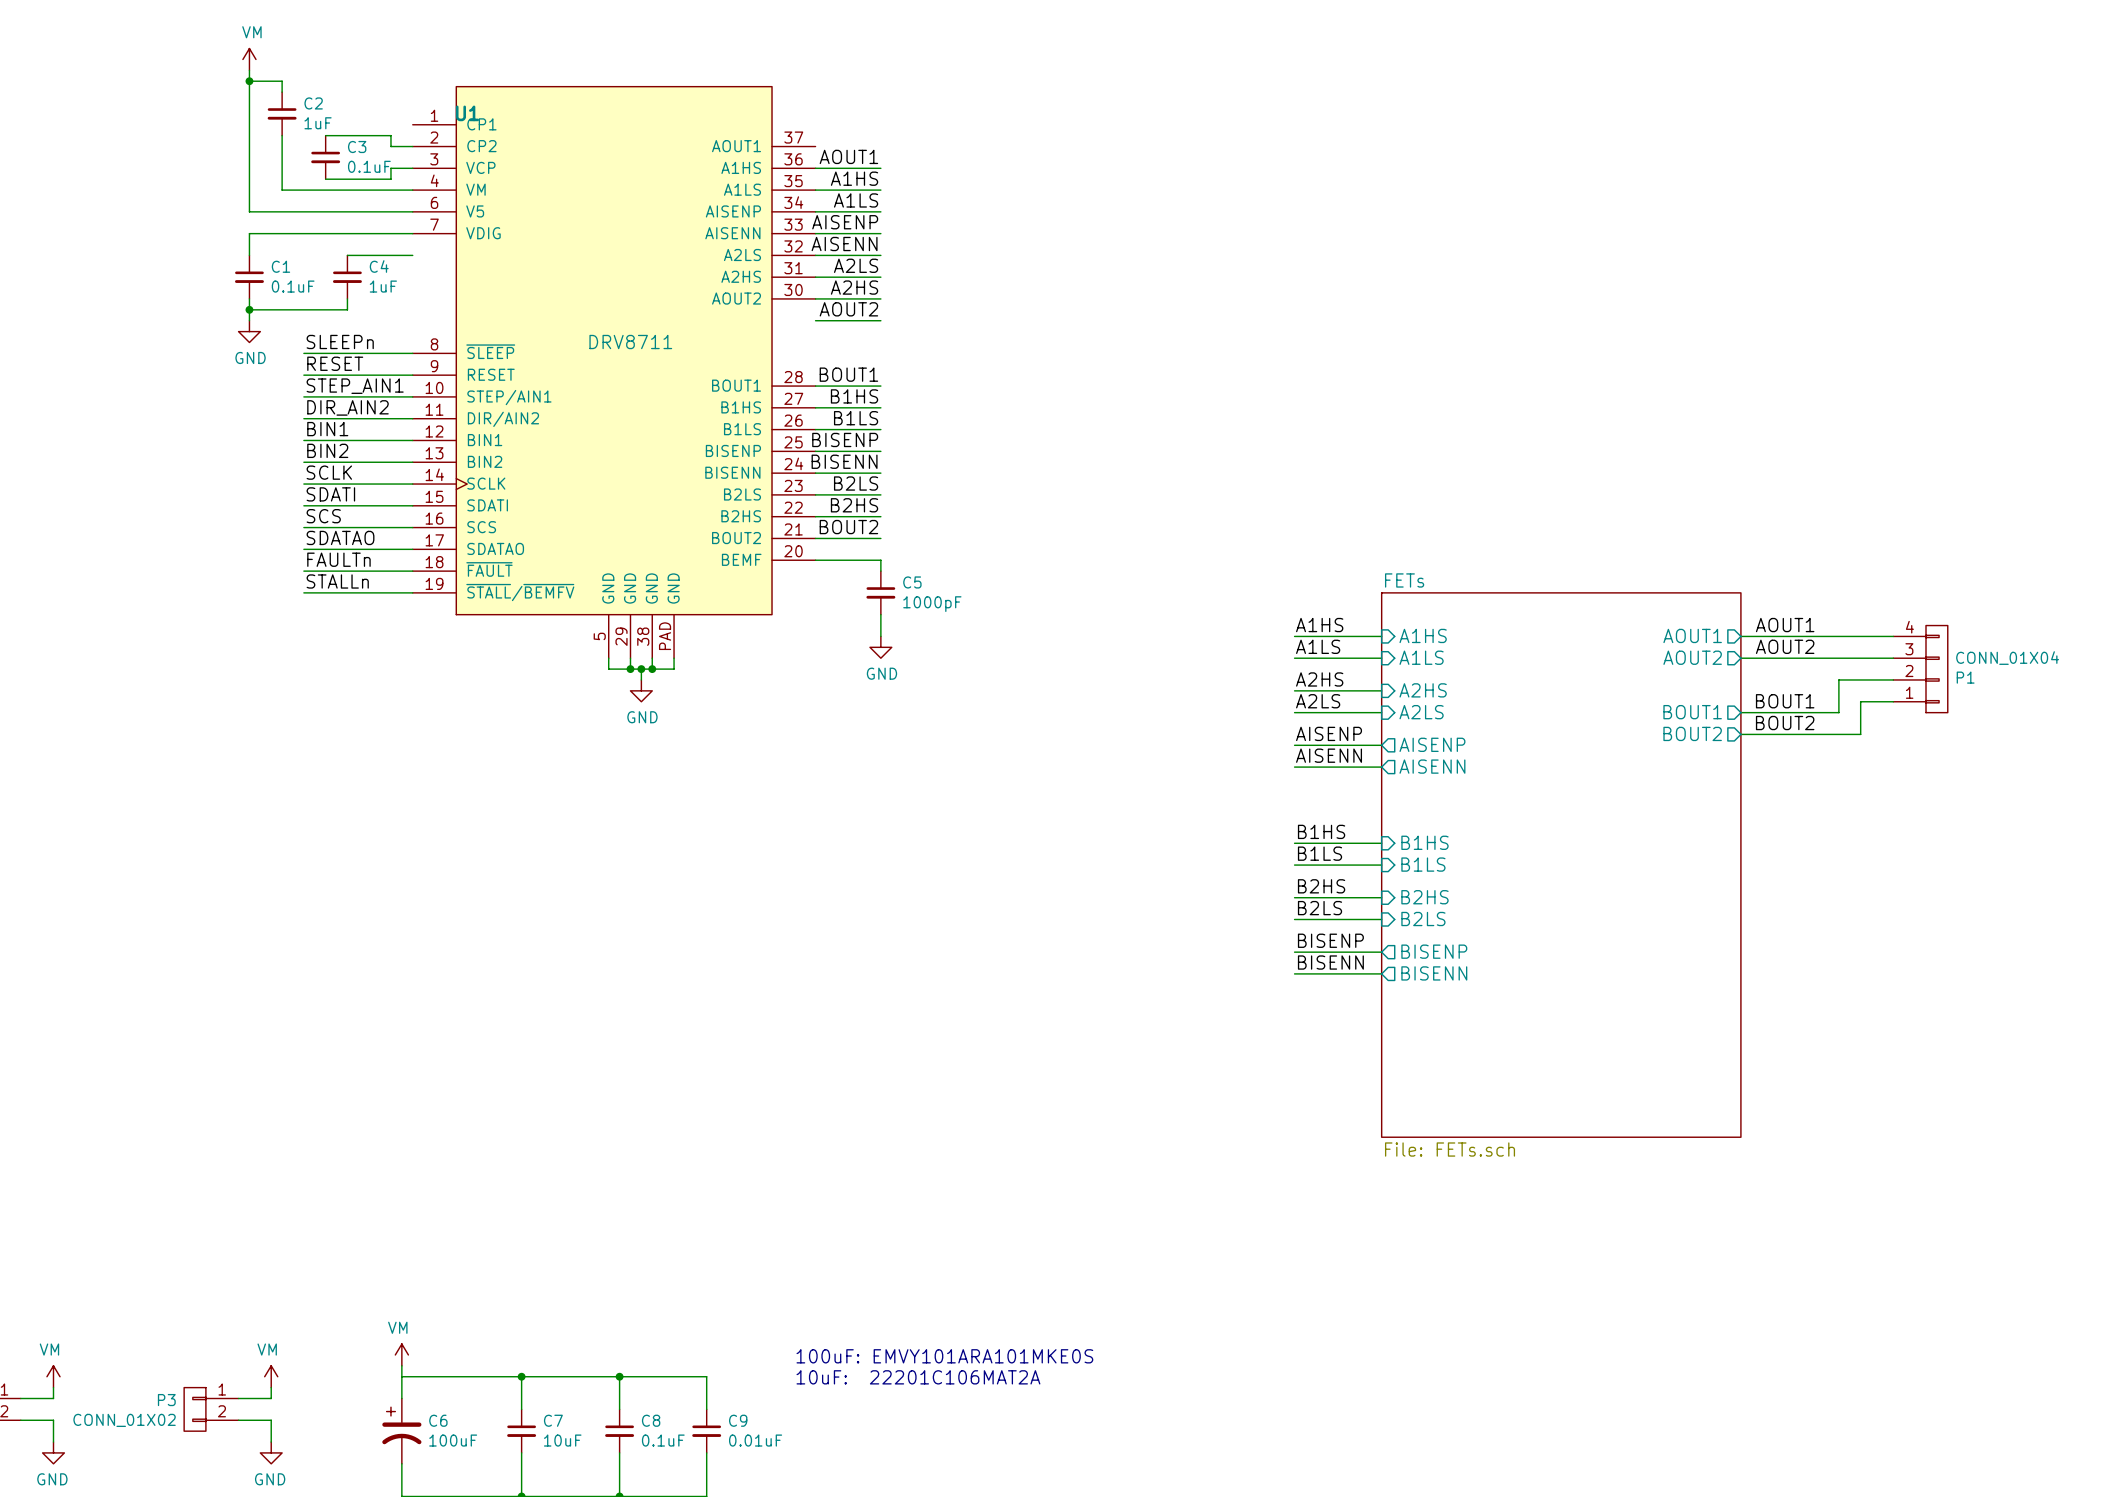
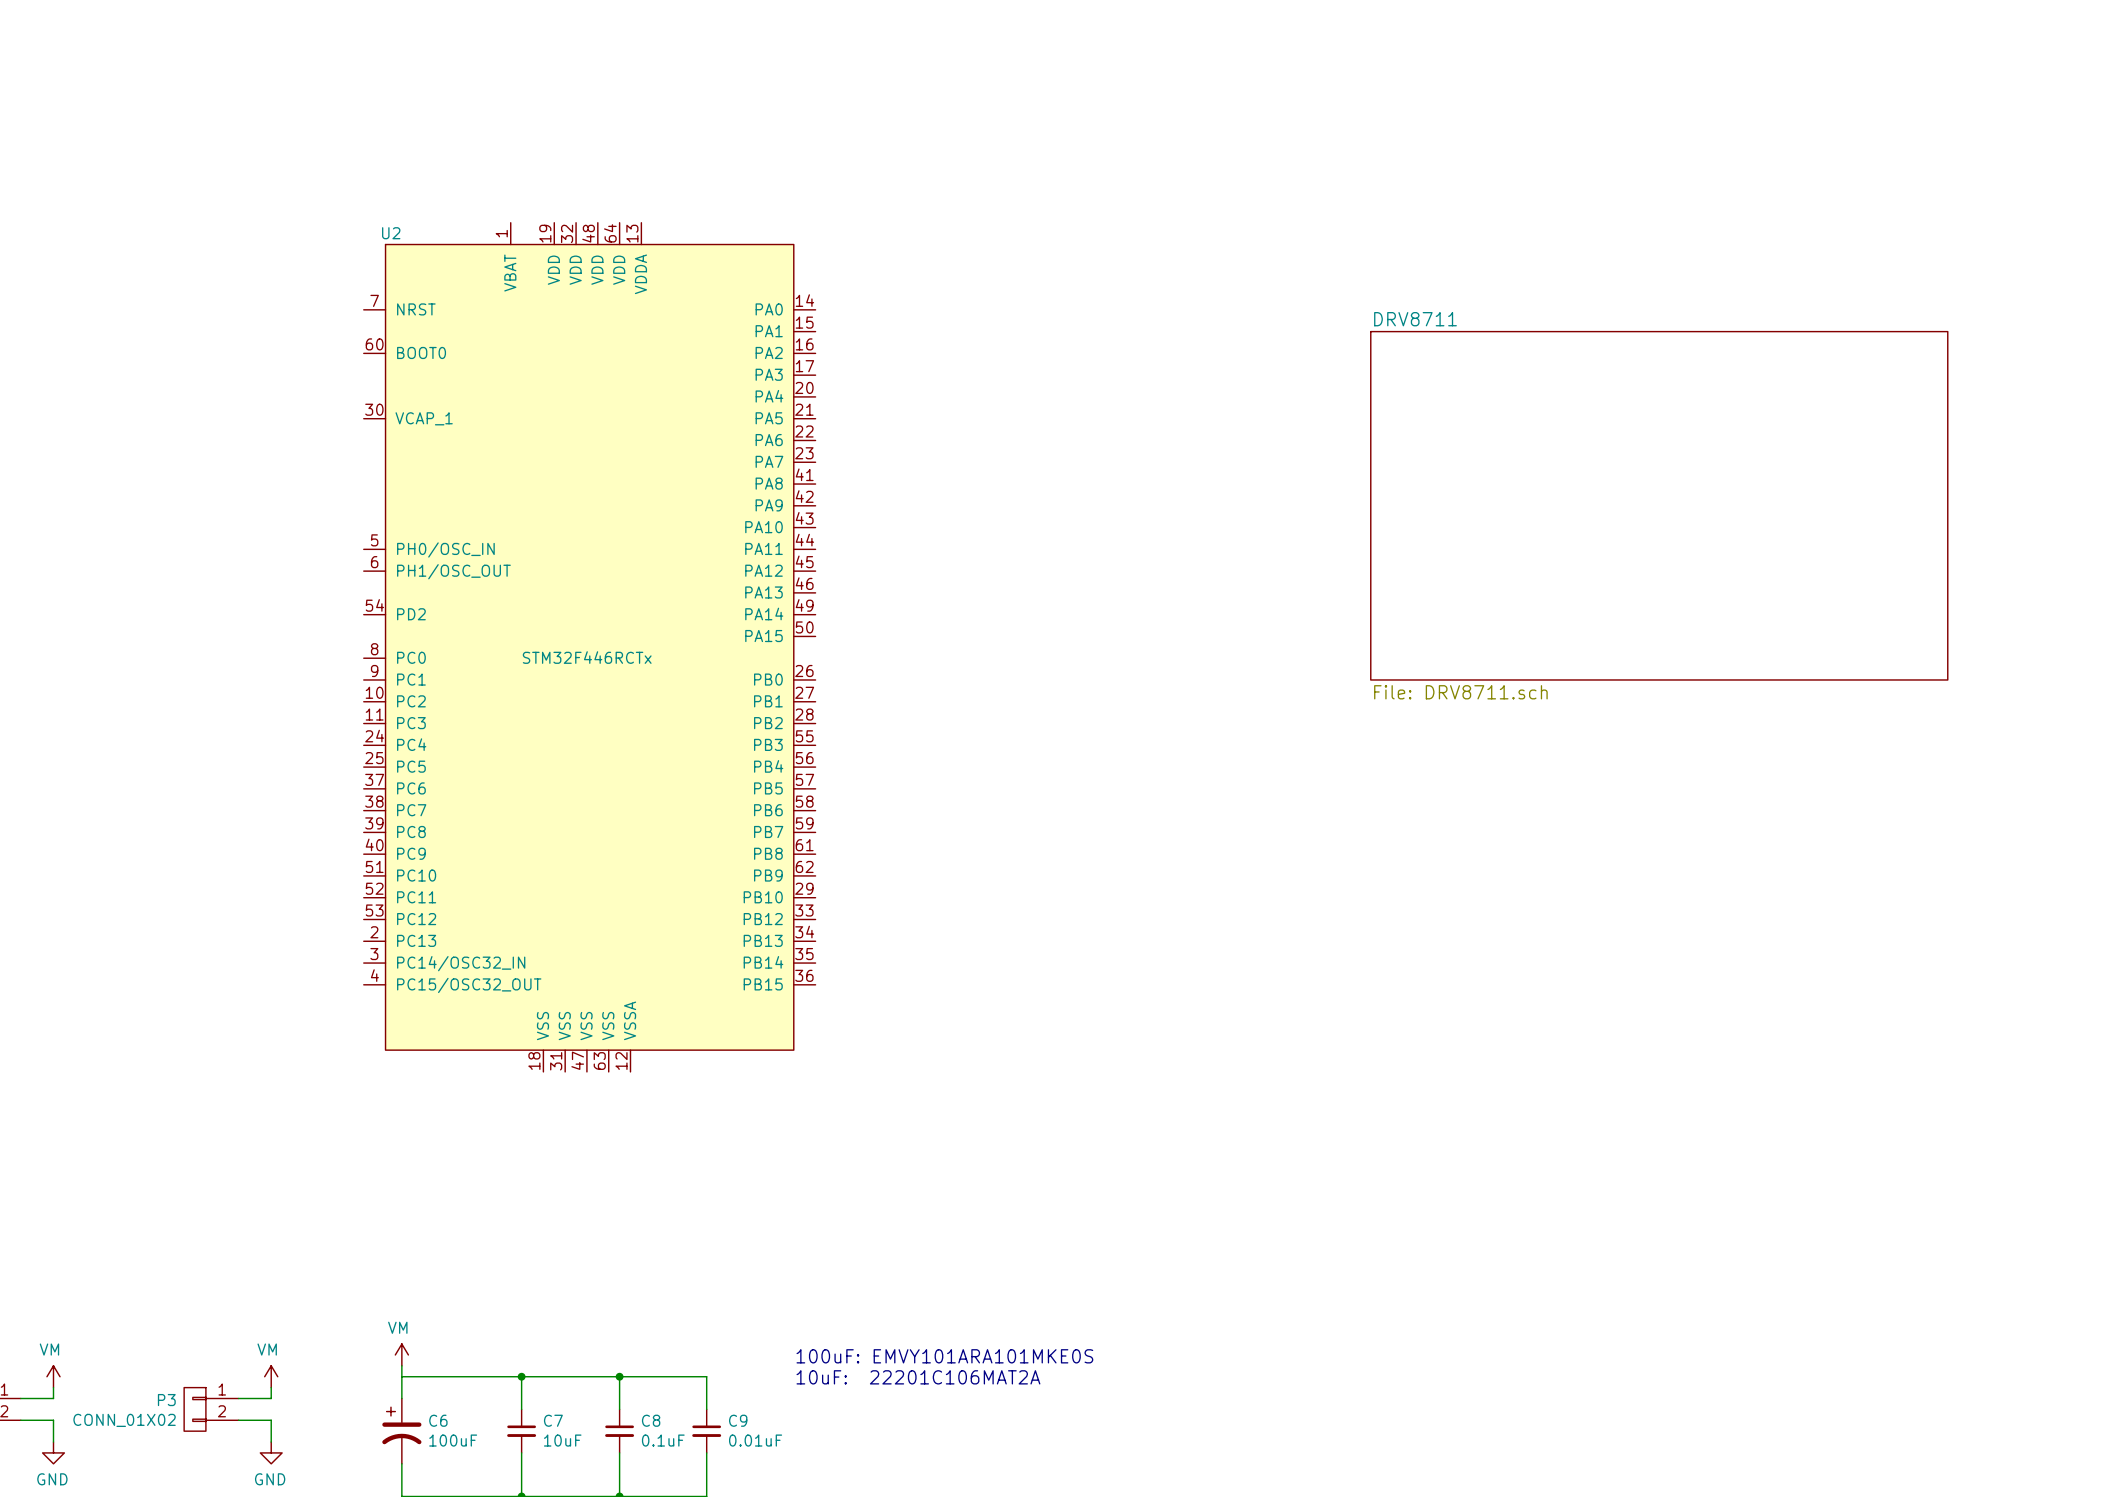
power symbol: VM (249, 59) -> none
wire: (249, 70) (249, 211) (412, 211) -> none
wire: (249, 81) (282, 81) (282, 92) -> none
junction: (249, 81) -> none
C2: 1uF (282, 113) -> none
wire: (282, 135) (282, 190) (412, 190) -> none
wire: (325, 135) (390, 135) (390, 146) (412, 146) -> none
label: AOUT1 (848, 156) -> none
C3: 0.1uF (325, 157) -> none
wire: (412, 168) (390, 168) (390, 179) (325, 179) -> none
wire: (815, 168) (880, 168) -> none
label: A1HS (854, 178) -> none
wire: (815, 190) (880, 190) -> none
label: A1LS (856, 200) -> none
wire: (815, 211) (880, 211) -> none
label: AISENP (845, 222) -> none
wire: (412, 233) (249, 233) (249, 255) -> none
wire: (815, 233) (880, 233) -> none
label: AISENN (844, 244) -> none
wire: (347, 255) (412, 255) -> none
wire: (815, 255) (880, 255) -> none
label: A2LS (856, 265) -> none
C1: 0.1uF (249, 277) -> none
C4: 1uF (347, 277) -> none
wire: (815, 277) (880, 277) -> none
label: A2HS (854, 287) -> none
wire: (249, 298) (249, 320) -> none
wire: (347, 298) (347, 309) (249, 309) -> none
wire: (815, 298) (880, 298) -> none
junction: (249, 309) -> none
label: AOUT2 (848, 309) -> none
wire: (815, 320) (880, 320) -> none
power symbol: GND (249, 331) -> none
label: SLEEPn (340, 341) -> none
wire: (303, 353) (412, 353) -> none
label: RESET (335, 363) -> none
U1: DRV8711 (614, 372) -> none
label: BOUT1 (848, 374) -> none
wire: (303, 375) (412, 375) -> none
label: STEP_AIN1 (355, 386) -> none
wire: (815, 386) (880, 386) -> none
wire: (303, 396) (412, 396) -> none
label: B1HS (854, 396) -> none
label: DIR_AIN2 (347, 407) -> none
wire: (815, 407) (880, 407) -> none
wire: (303, 418) (412, 418) -> none
label: B1LS (856, 418) -> none
label: BIN1 (327, 429) -> none
wire: (815, 429) (880, 429) -> none
label: BISENP (845, 439) -> none
wire: (303, 440) (412, 440) -> none
label: BIN2 (327, 450) -> none
wire: (815, 451) (880, 451) -> none
label: BISENN (844, 461) -> none
wire: (303, 462) (412, 462) -> none
label: SCLK (329, 472) -> none
wire: (815, 473) (880, 473) -> none
label: B2LS (856, 483) -> none
wire: (303, 484) (412, 484) -> none
label: SDATI (330, 494) -> none
wire: (815, 494) (880, 494) -> none
wire: (303, 505) (412, 505) -> none
label: B2HS (854, 505) -> none
sheet DRV8711: none -> File: DRV8711.sch (1659, 505)
label: SCS (323, 516) -> none
wire: (815, 516) (880, 516) -> none
wire: (303, 527) (412, 527) -> none
label: BOUT2 (848, 527) -> none
label: SDATAO (340, 537) -> none
wire: (815, 538) (880, 538) -> none
wire: (303, 549) (412, 549) -> none
label: FAULTn (338, 559) -> none
wire: (815, 560) (880, 560) (880, 571) -> none
wire: (303, 571) (412, 571) -> none
label: STALLn (337, 581) -> none
wire: (303, 592) (412, 592) -> none
C5: 1000pF (880, 592) -> none
wire: (880, 614) (880, 636) -> none
label: A1HS (1319, 625) -> none
label: AOUT1 (1785, 625) -> none
sheet pin: A1HS (1423, 635) -> none
sheet pin: AOUT1 (1692, 635) -> none
wire: (1294, 636) (1381, 636) -> none
wire: (1740, 636) (1893, 636) -> none
label: A1LS (1318, 646) -> none
label: AOUT2 (1785, 646) -> none
U2: none -> STM32F446RCTx (589, 647)
power symbol: GND (880, 647) -> none
sheet pin: A1LS (1421, 657) -> none
sheet pin: AOUT2 (1692, 657) -> none
wire: (1294, 658) (1381, 658) -> none
wire: (1740, 658) (1893, 658) -> none
junction: (630, 669) -> none
junction: (641, 669) -> none
junction: (652, 669) -> none
P1: CONN_01X04 (1920, 669) -> none
label: A2HS (1319, 679) -> none
wire: (1893, 679) (1838, 679) (1838, 712) (1740, 712) -> none
power symbol: GND (641, 690) -> none
wire: (1294, 690) (1381, 690) -> none
sheet pin: A2HS (1423, 690) -> none
label: A2LS (1318, 701) -> none
label: BOUT1 (1785, 701) -> none
wire: (1893, 701) (1860, 701) (1860, 734) (1740, 734) -> none
wire: (1294, 712) (1381, 712) -> none
sheet pin: A2LS (1421, 712) -> none
sheet pin: BOUT1 (1692, 712) -> none
label: BOUT2 (1785, 723) -> none
label: AISENP (1329, 733) -> none
sheet pin: BOUT2 (1692, 733) -> none
sheet pin: AISENP (1432, 744) -> none
wire: (1294, 745) (1381, 745) -> none
label: AISENN (1329, 755) -> none
sheet pin: AISENN (1432, 766) -> none
wire: (1294, 767) (1381, 767) -> none
label: B1HS (1321, 831) -> none
sheet pin: B1HS (1424, 842) -> none
wire: (1294, 843) (1381, 843) -> none
label: B1LS (1320, 853) -> none
sheet pin: B1LS (1423, 864) -> none
wire: (1294, 865) (1381, 865) -> none
sheet FETs: File: FETs.sch (1561, 865) -> none
label: B2HS (1321, 886) -> none
wire: (1294, 897) (1381, 897) -> none
sheet pin: B2HS (1424, 897) -> none
label: B2LS (1320, 908) -> none
wire: (1294, 919) (1381, 919) -> none
sheet pin: B2LS (1423, 919) -> none
label: BISENP (1330, 940) -> none
sheet pin: BISENP (1434, 951) -> none
wire: (1294, 952) (1381, 952) -> none
label: BISENN (1330, 962) -> none
wire: (1294, 973) (1381, 973) -> none
sheet pin: BISENN (1434, 973) -> none

